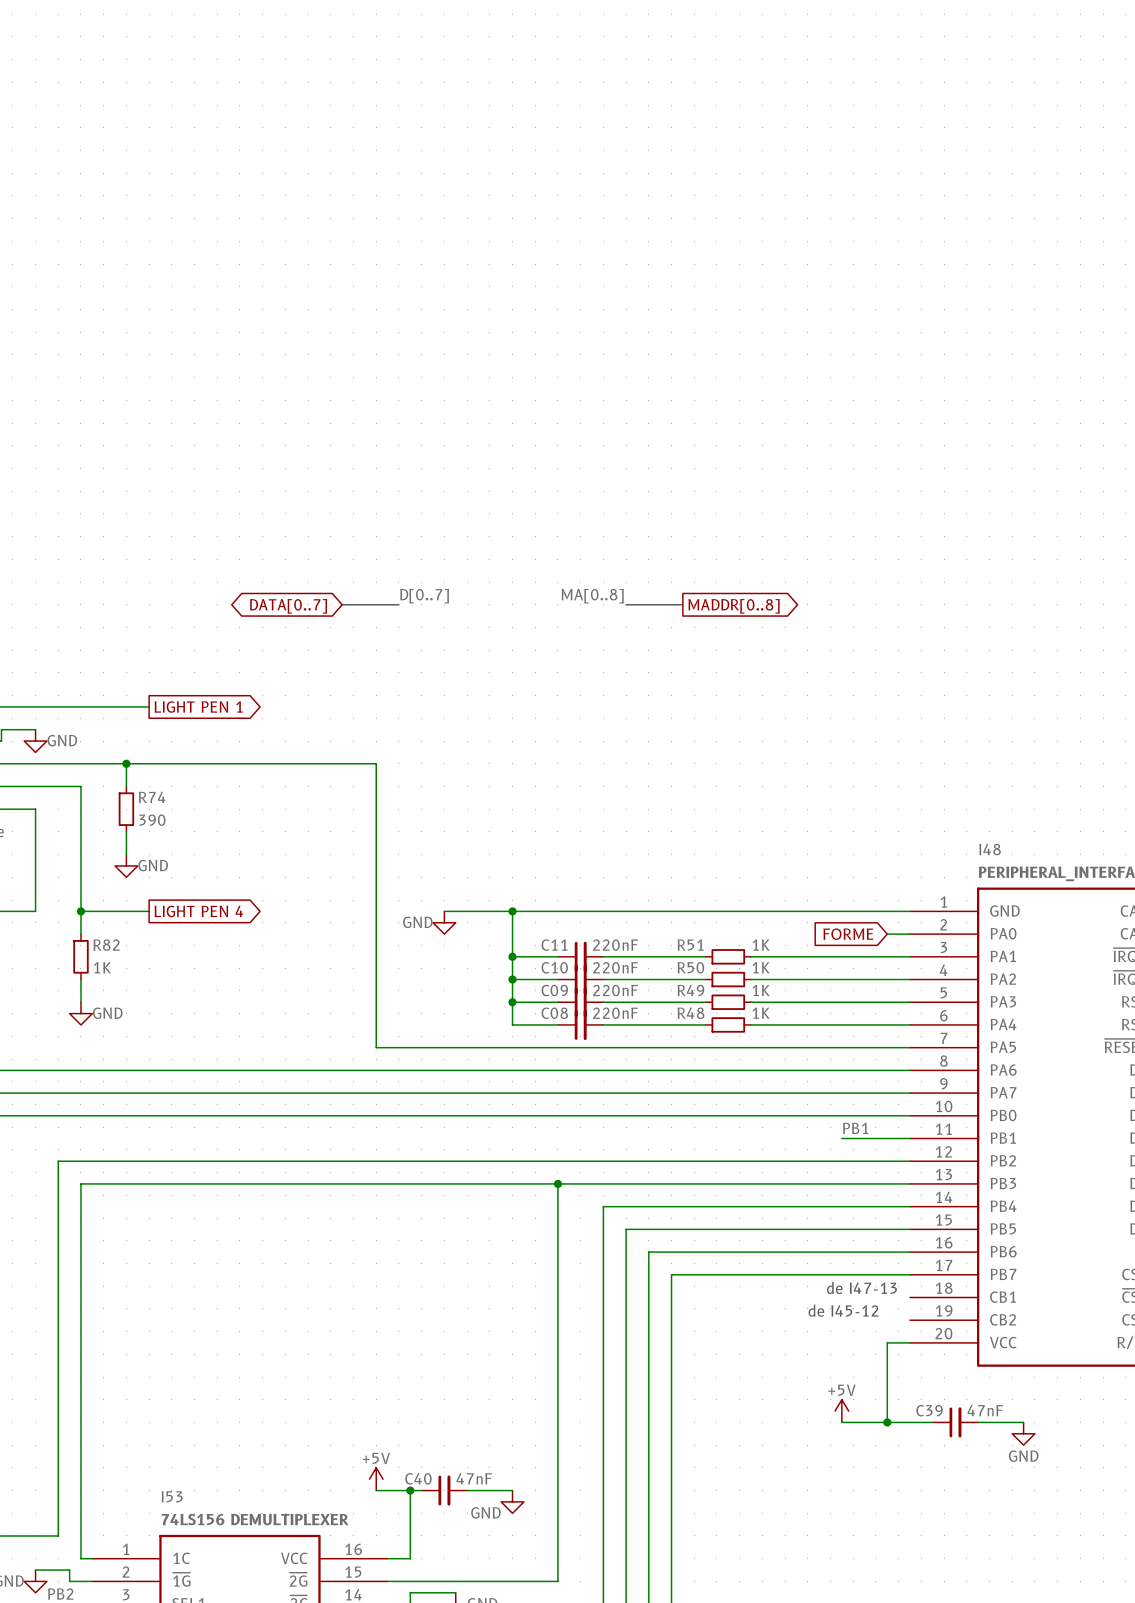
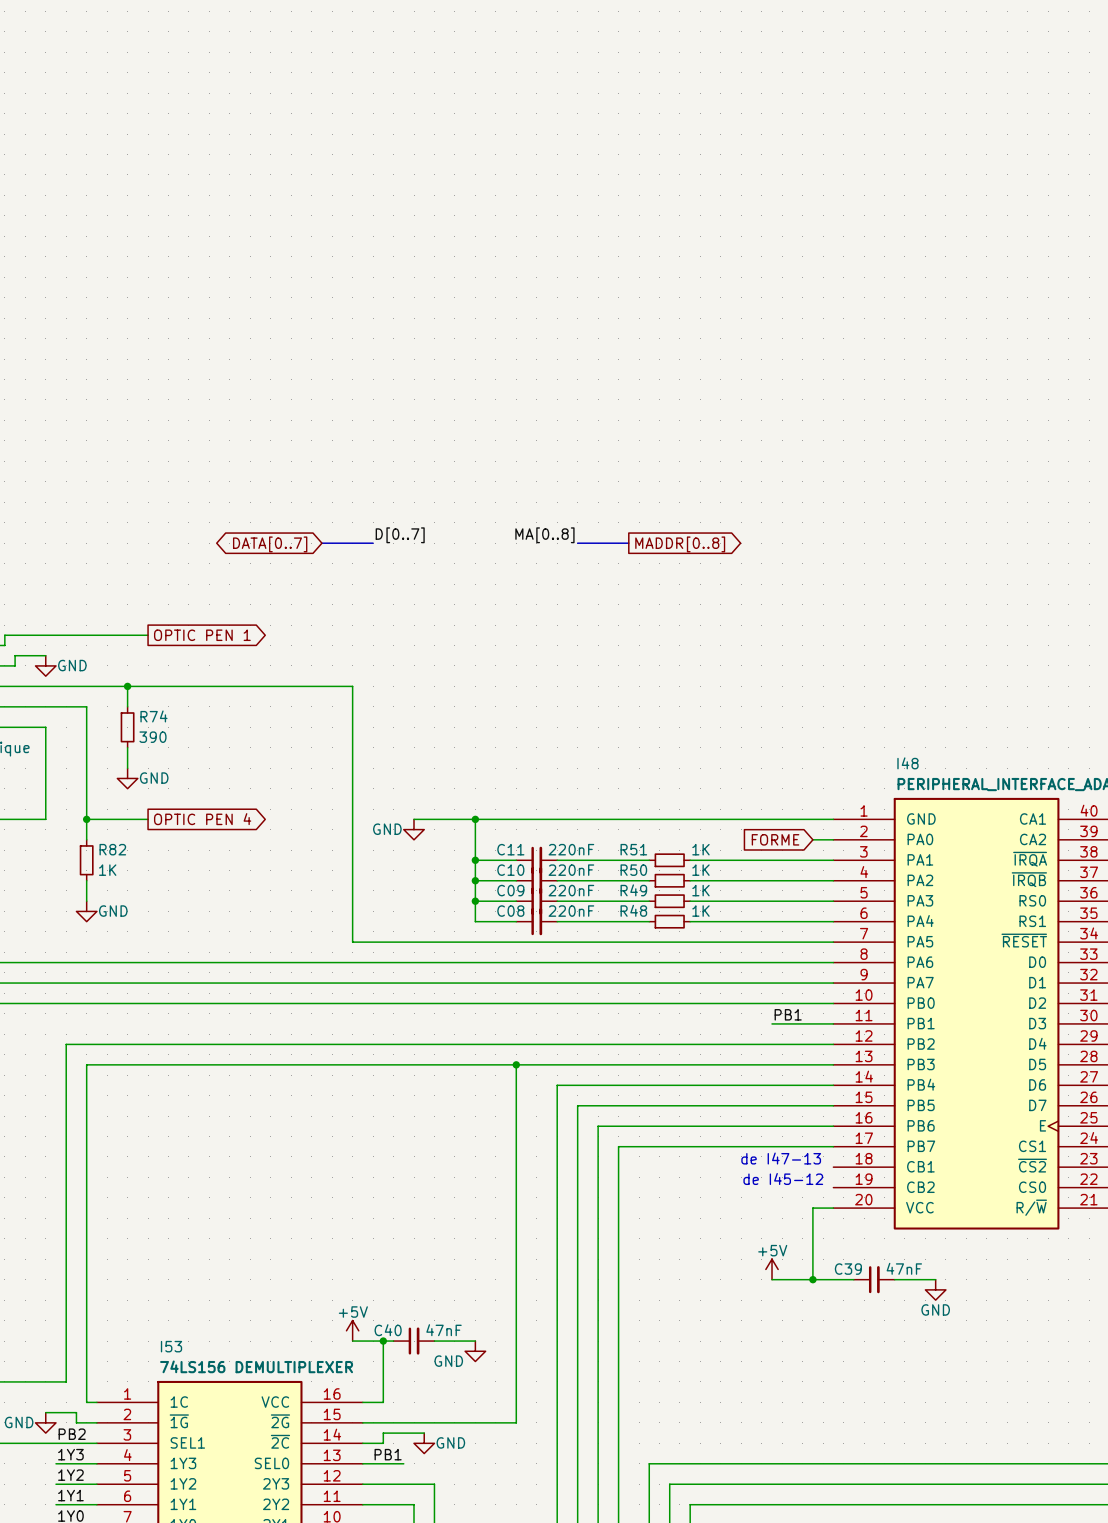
global label: LIGHT PEN 1 (198, 707) -> OPTIC PEN 1 (202, 635)
global label: LIGHT PEN 4 (198, 911) -> OPTIC PEN 4 (202, 819)

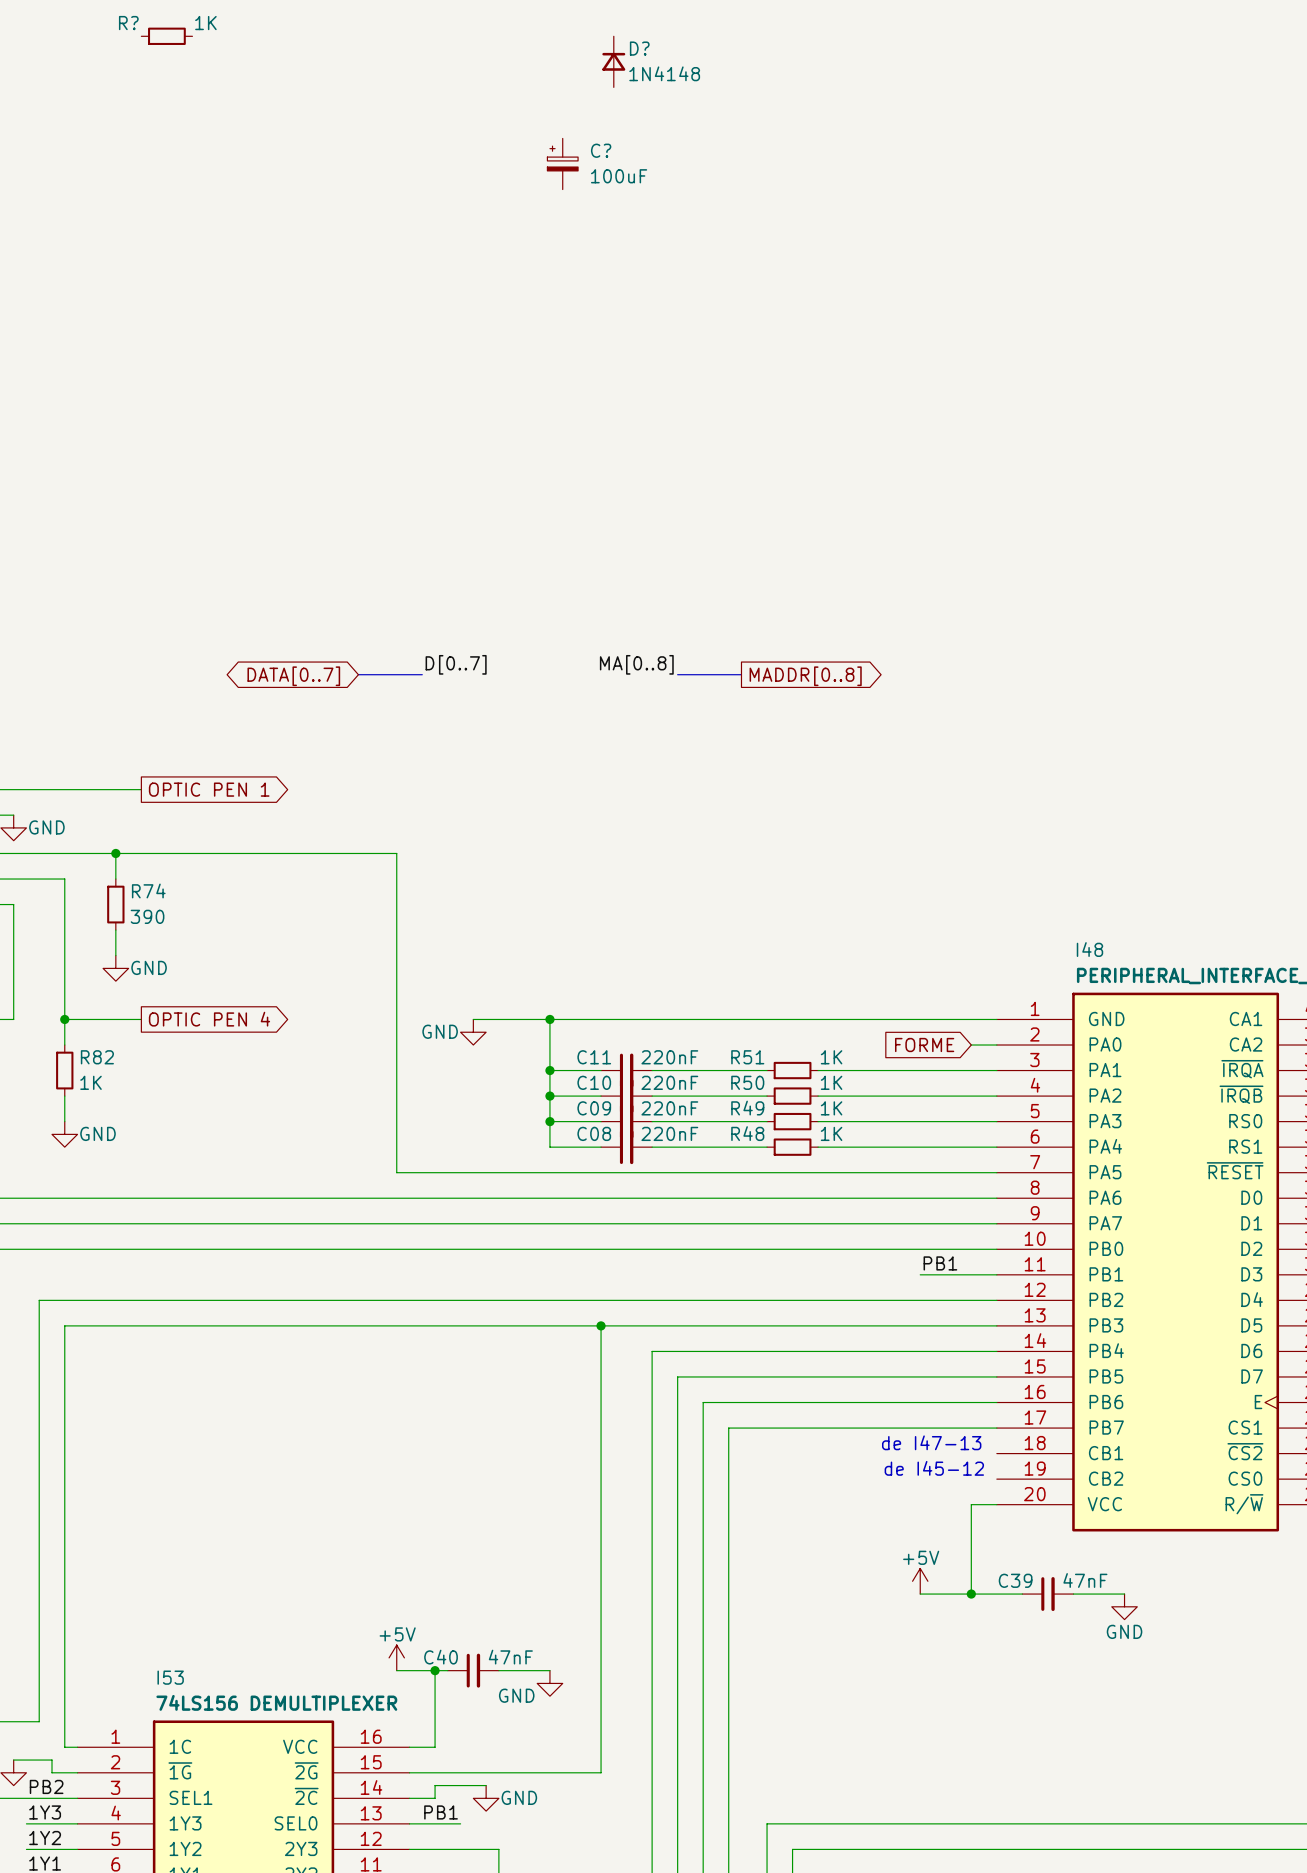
R?: none -> 1K (166, 36)
D?: none -> 1N4148 (613, 61)
C?: none -> 100uF (562, 163)

